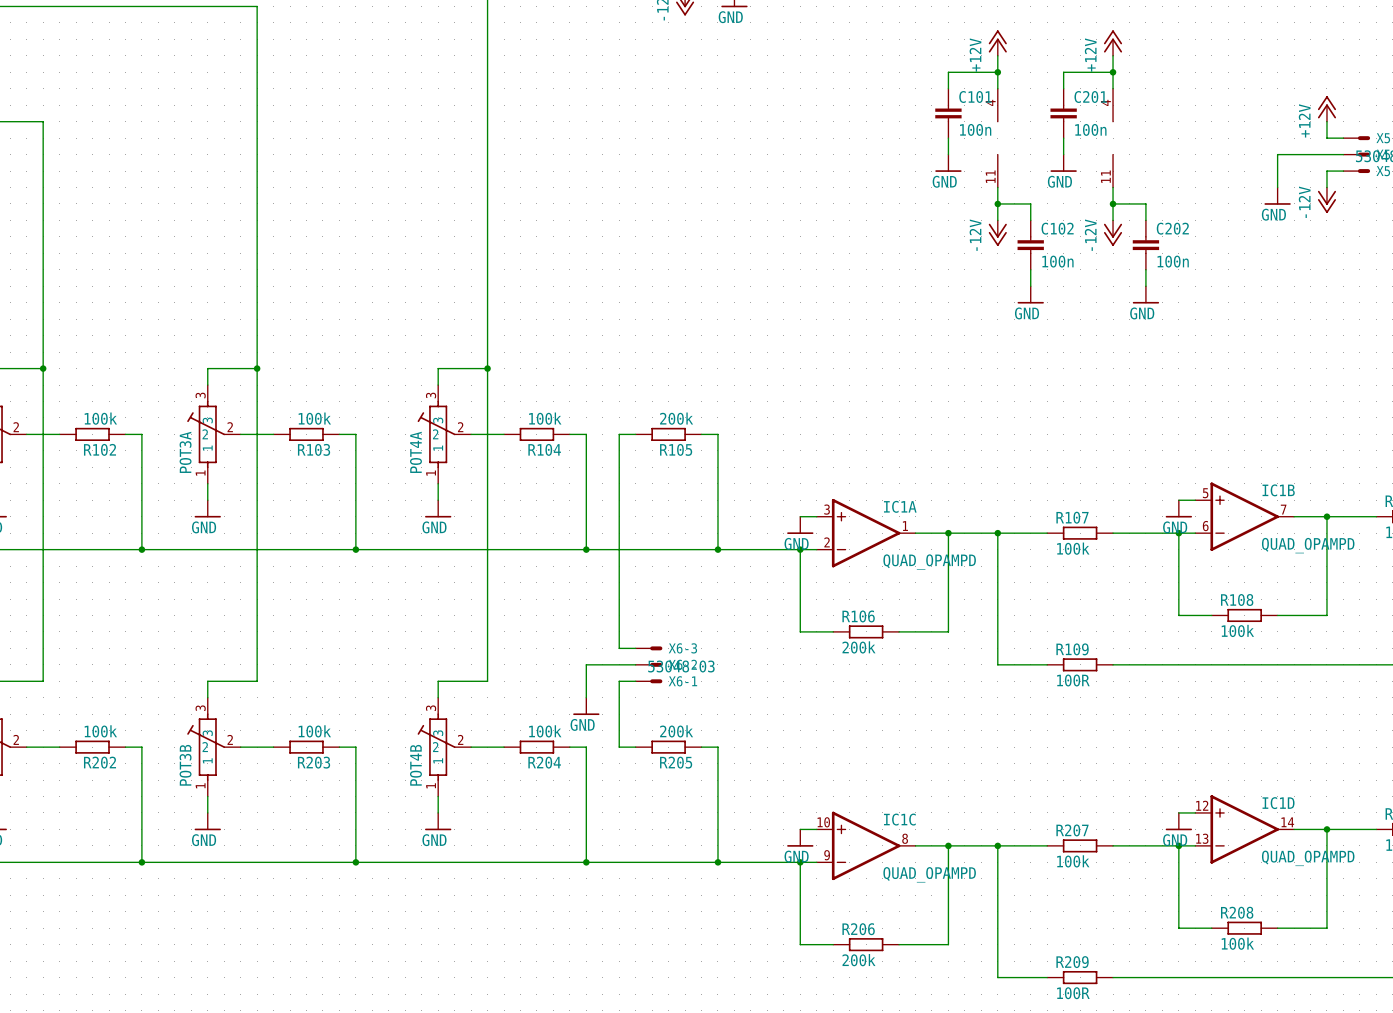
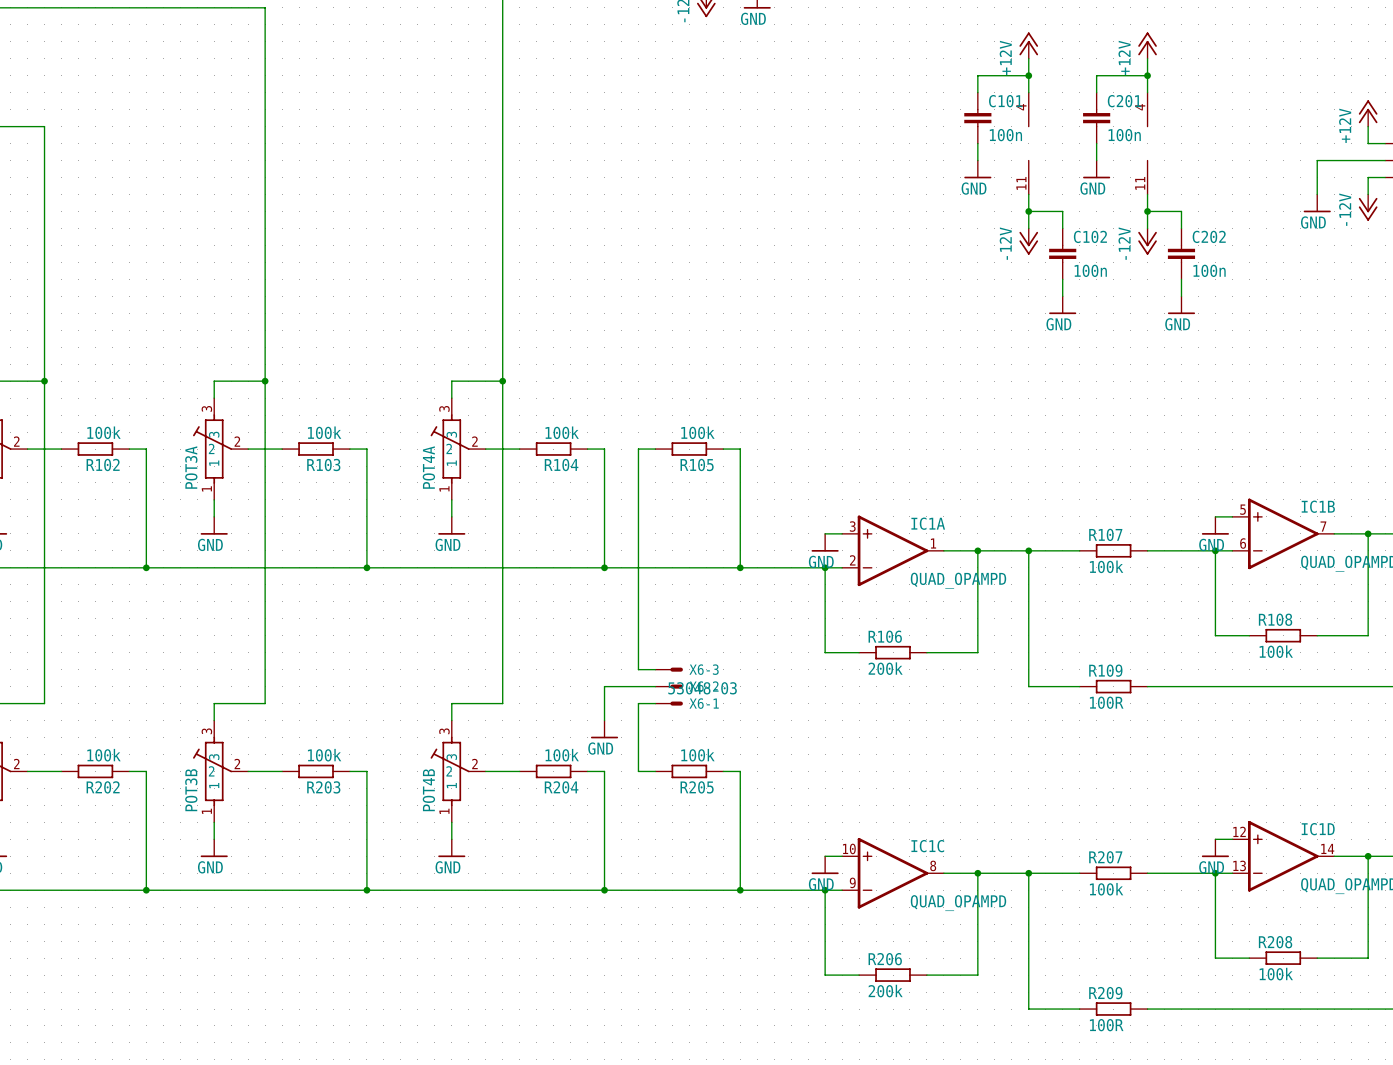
R105 value: 200k (676, 418) -> 100k (697, 432)
R205 value: 200k (676, 731) -> 100k (697, 755)

